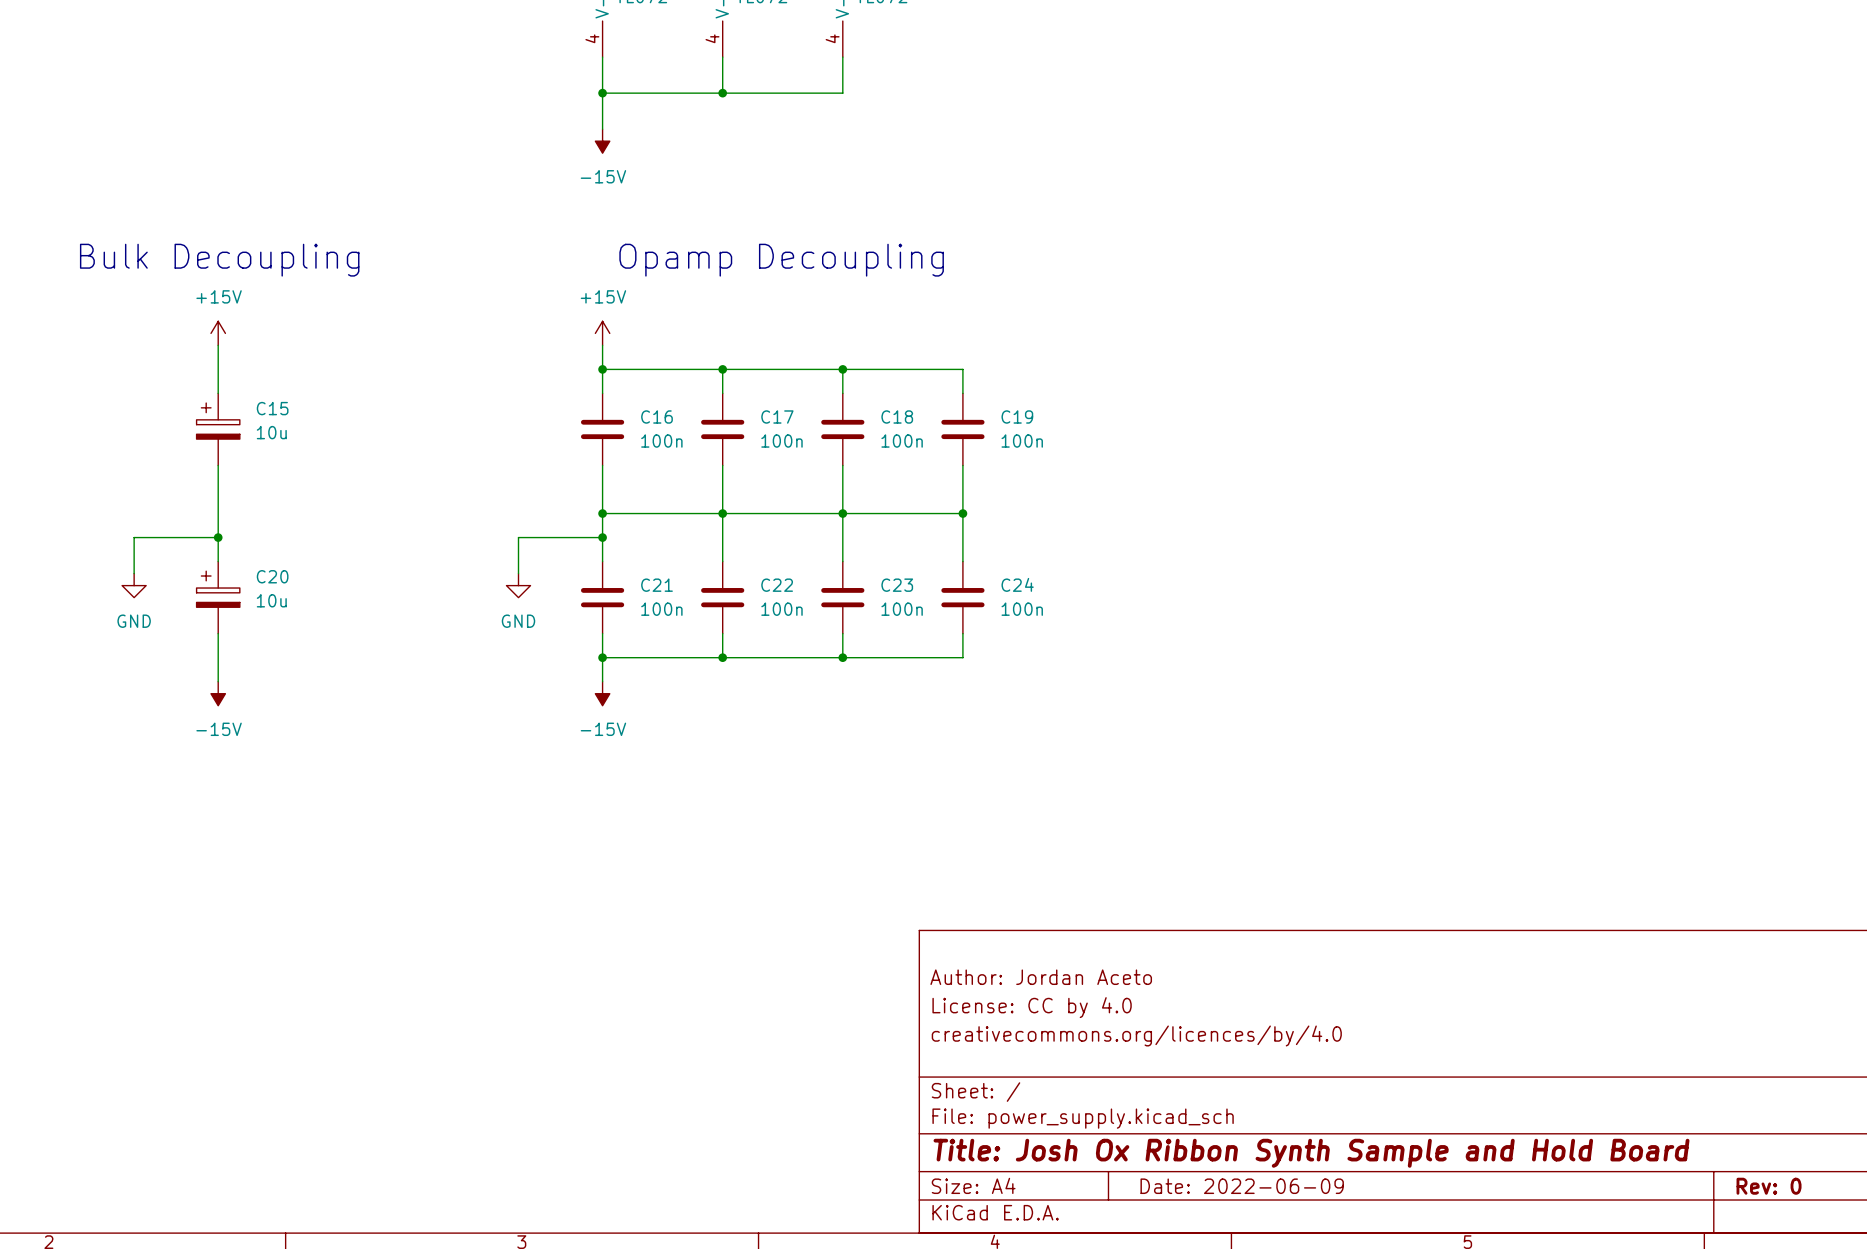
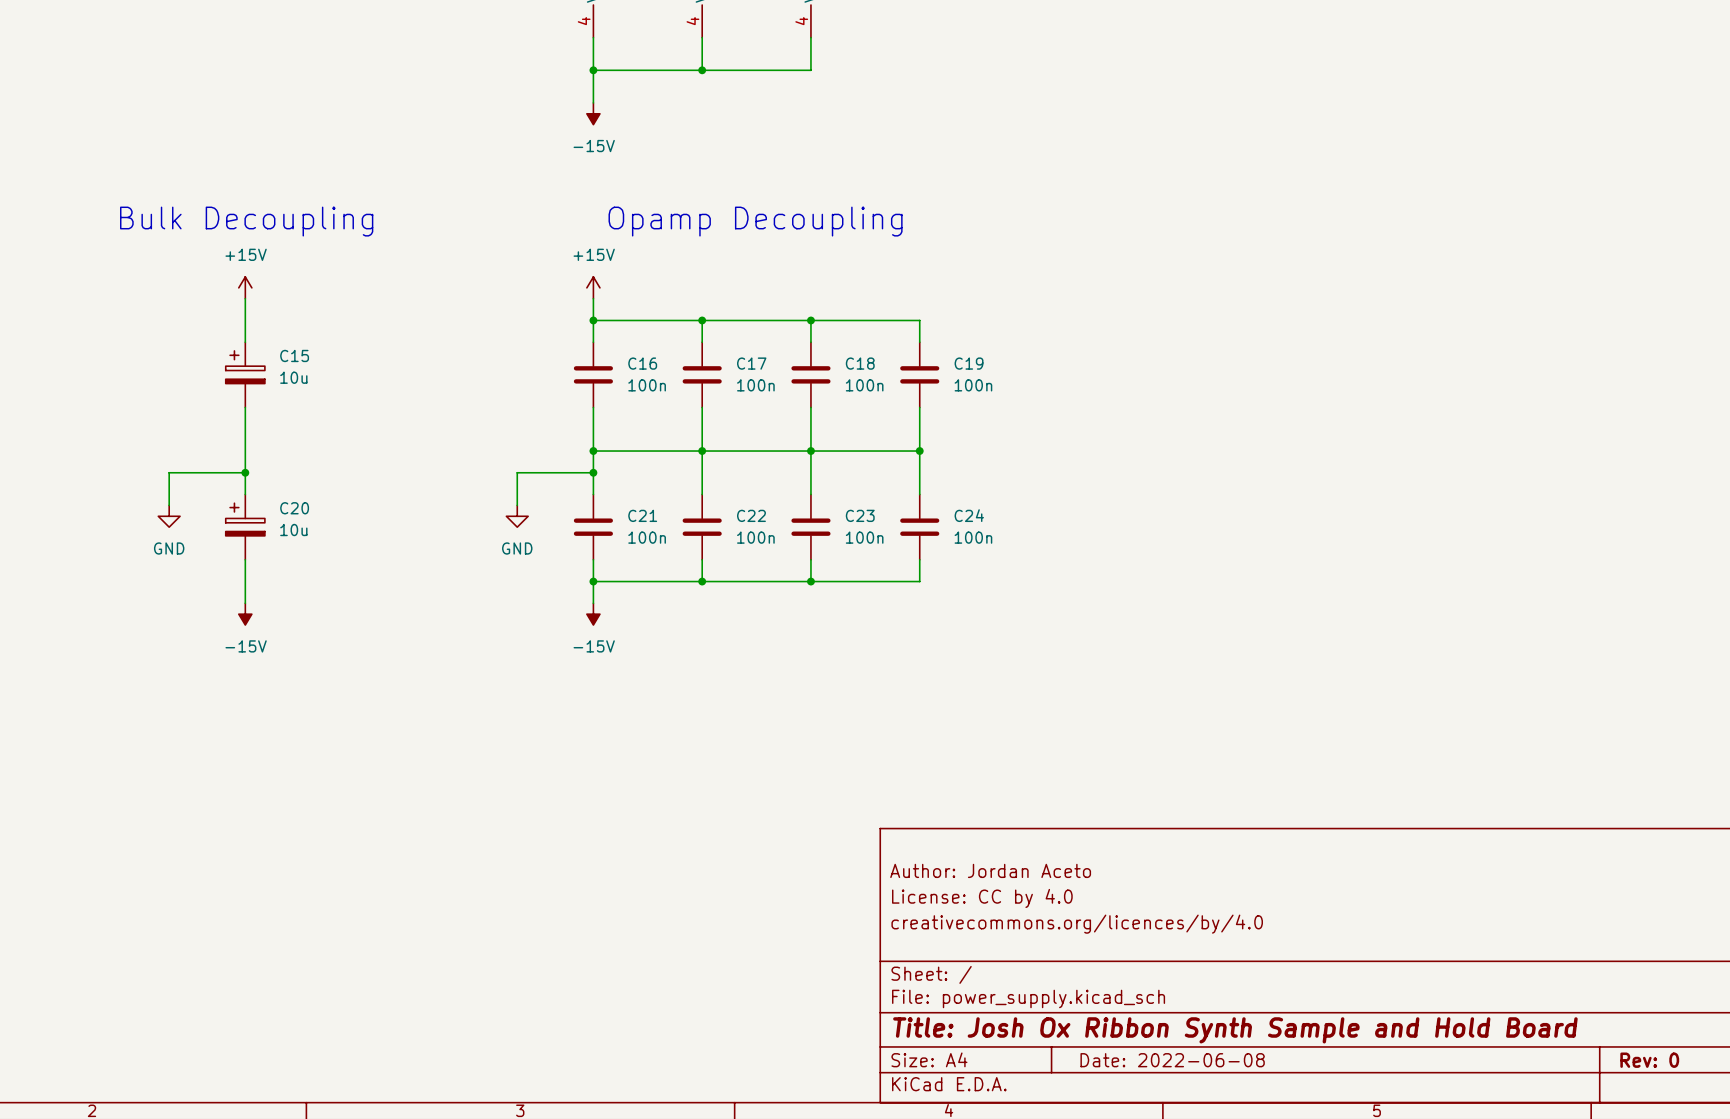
title block: Date: 2022-06-09 (1242, 1186) -> Date: 2022-06-08 (1172, 1060)

